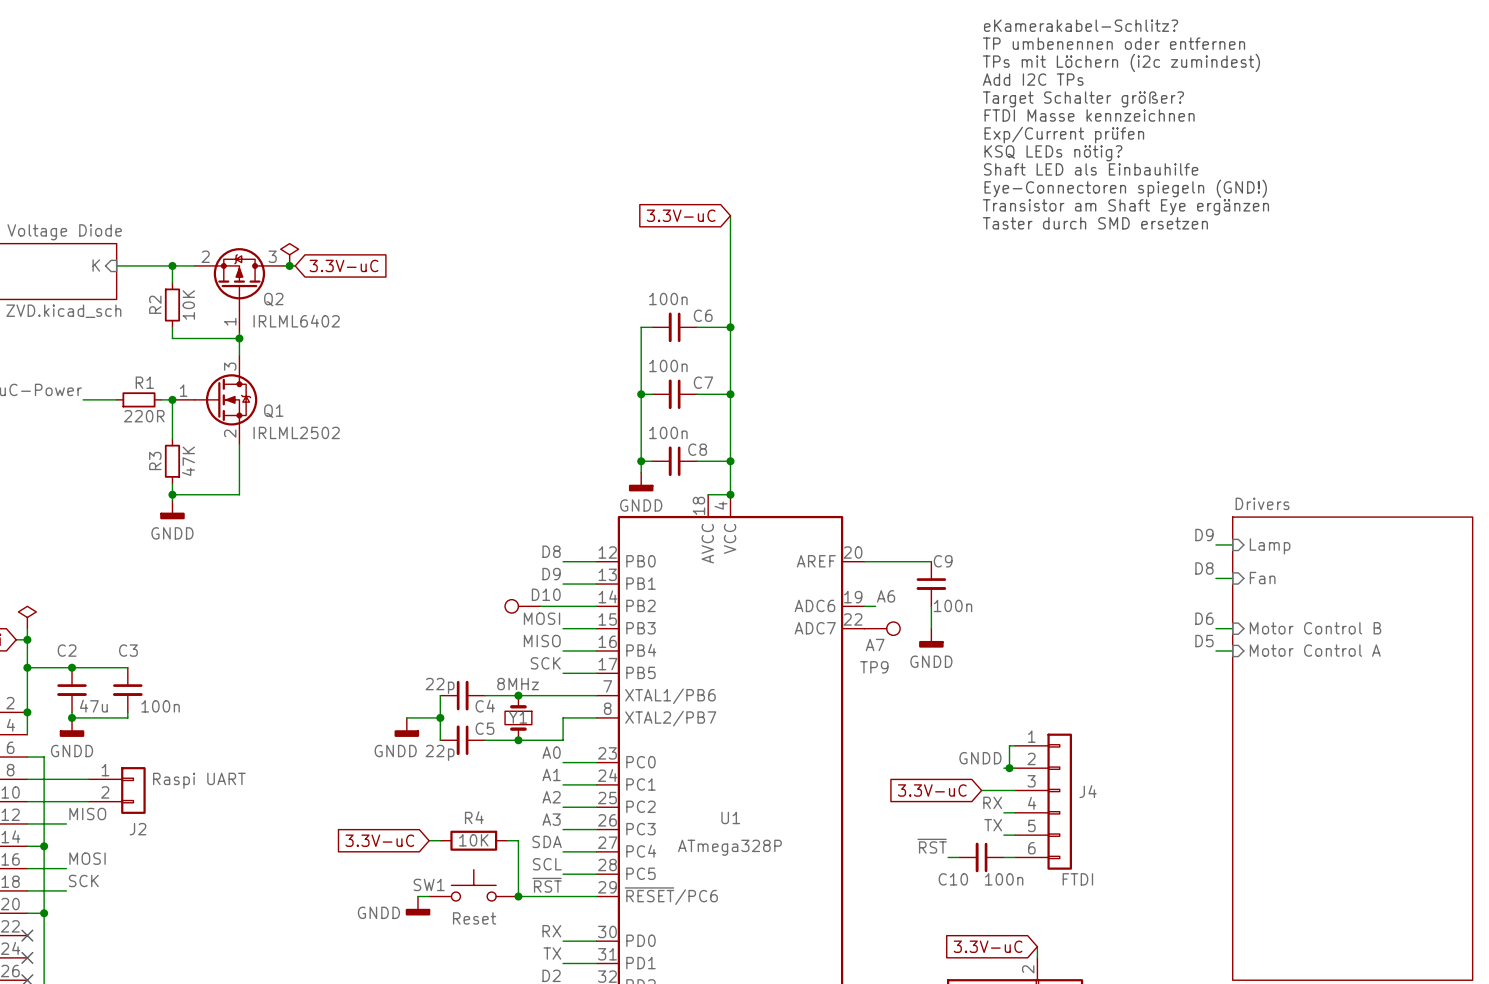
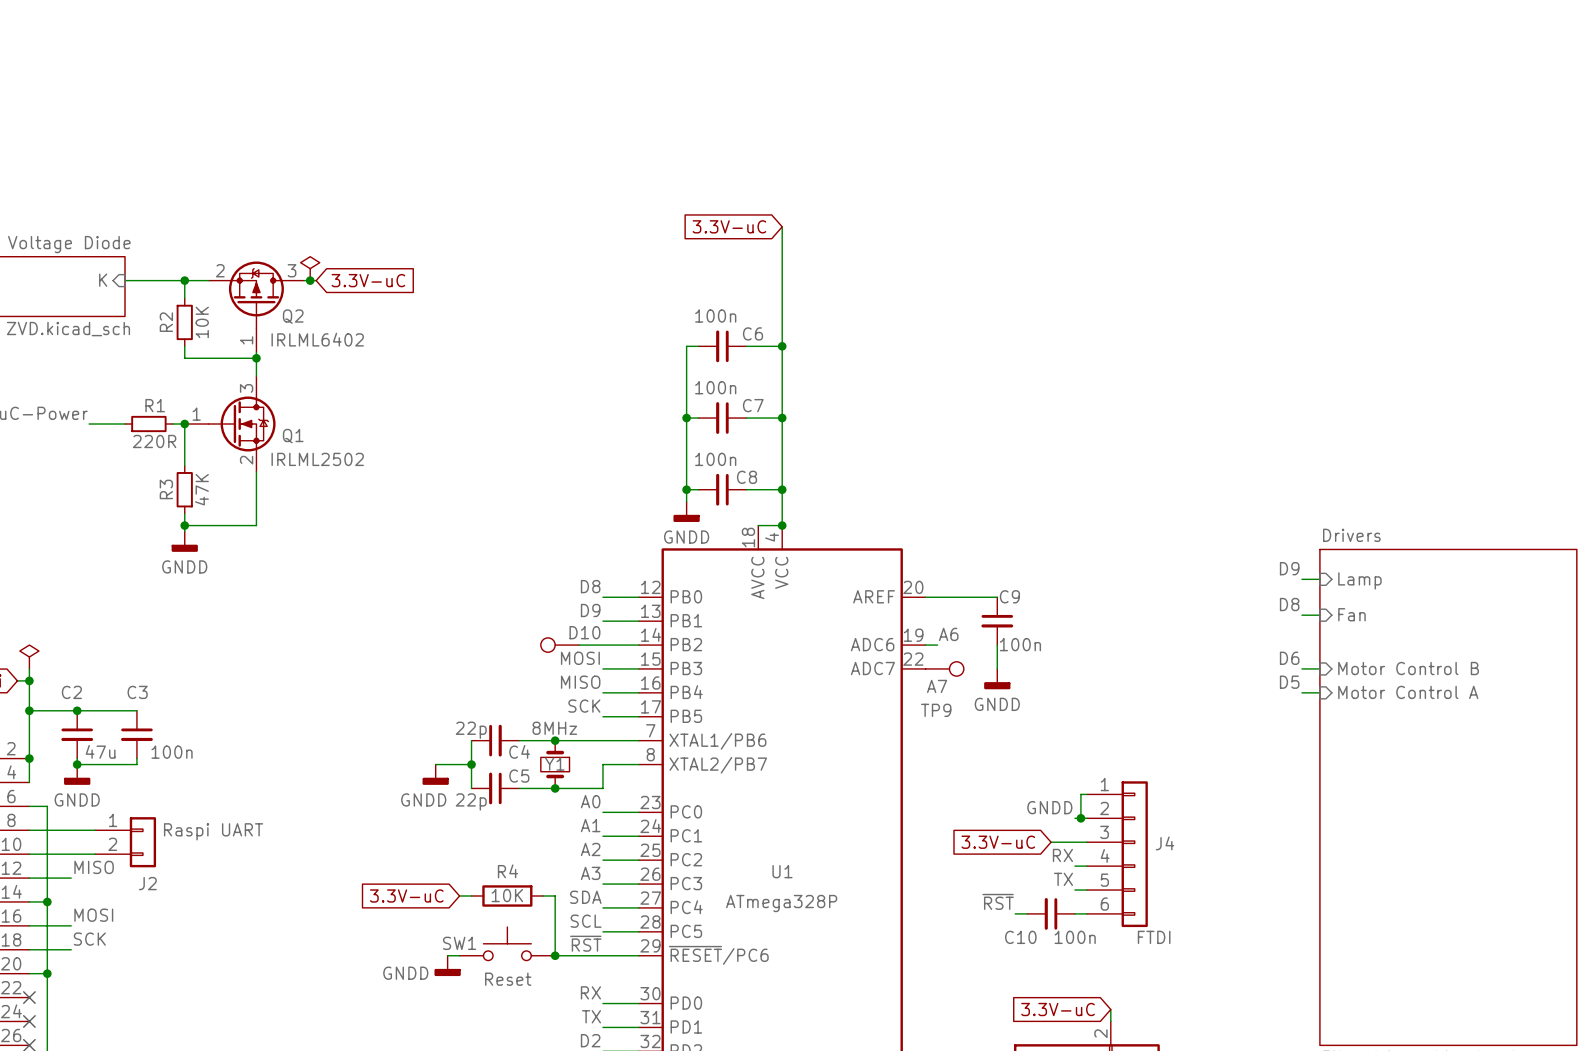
text: eKamerakabel-Schlitz? (1081, 25) -> none
text: TP umbenennen oder entfernen (1114, 43) -> none
text: TPs mit Löchern (i2c zumindest) (1121, 62) -> none
text: Add I2C TPs (1033, 79) -> none
text: Target Schalter größer? (1083, 99) -> none
text: FTDI Masse kennzeichnen (1089, 115) -> none
text: Exp/Current prüfen (1064, 135) -> none
text: KSQ LEDs nötig? (1053, 153) -> none
text: Shaft LED als Einbauhilfe (1091, 169) -> none
text: Eye-Connectoren spiegeln (GND!) (1125, 188) -> none
text: Transistor am Shaft Eye ergänzen (1125, 207) -> none
text: Taster durch SMD ersetzen (1095, 223) -> none

